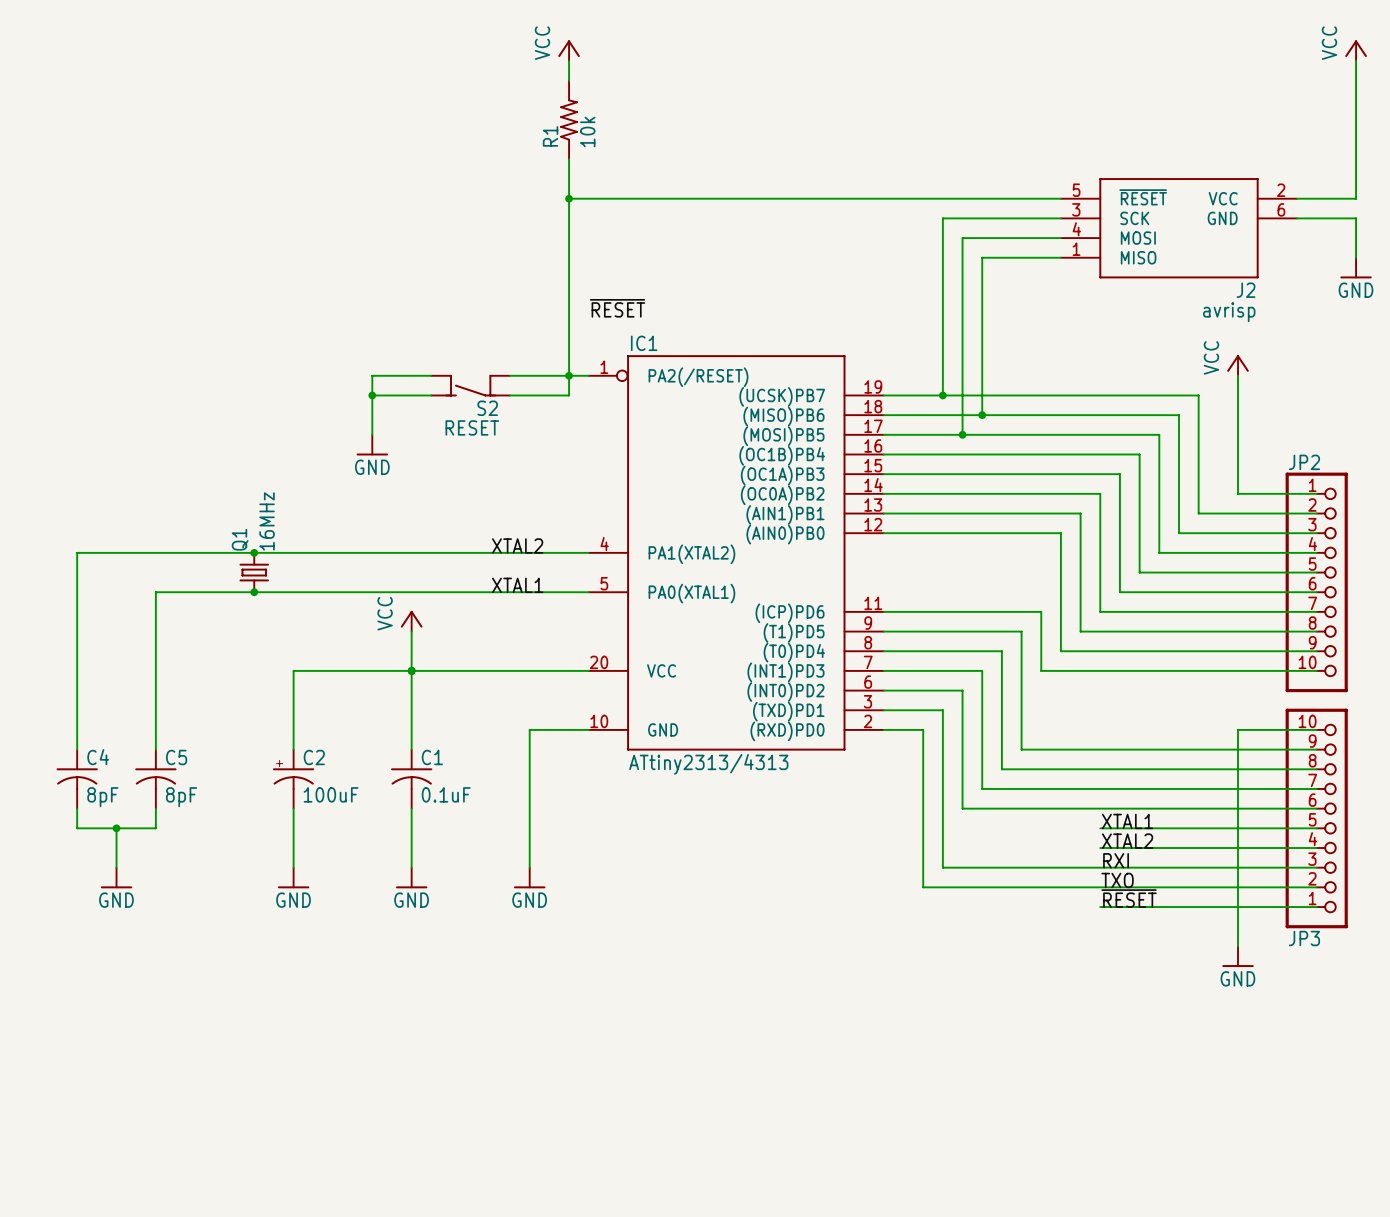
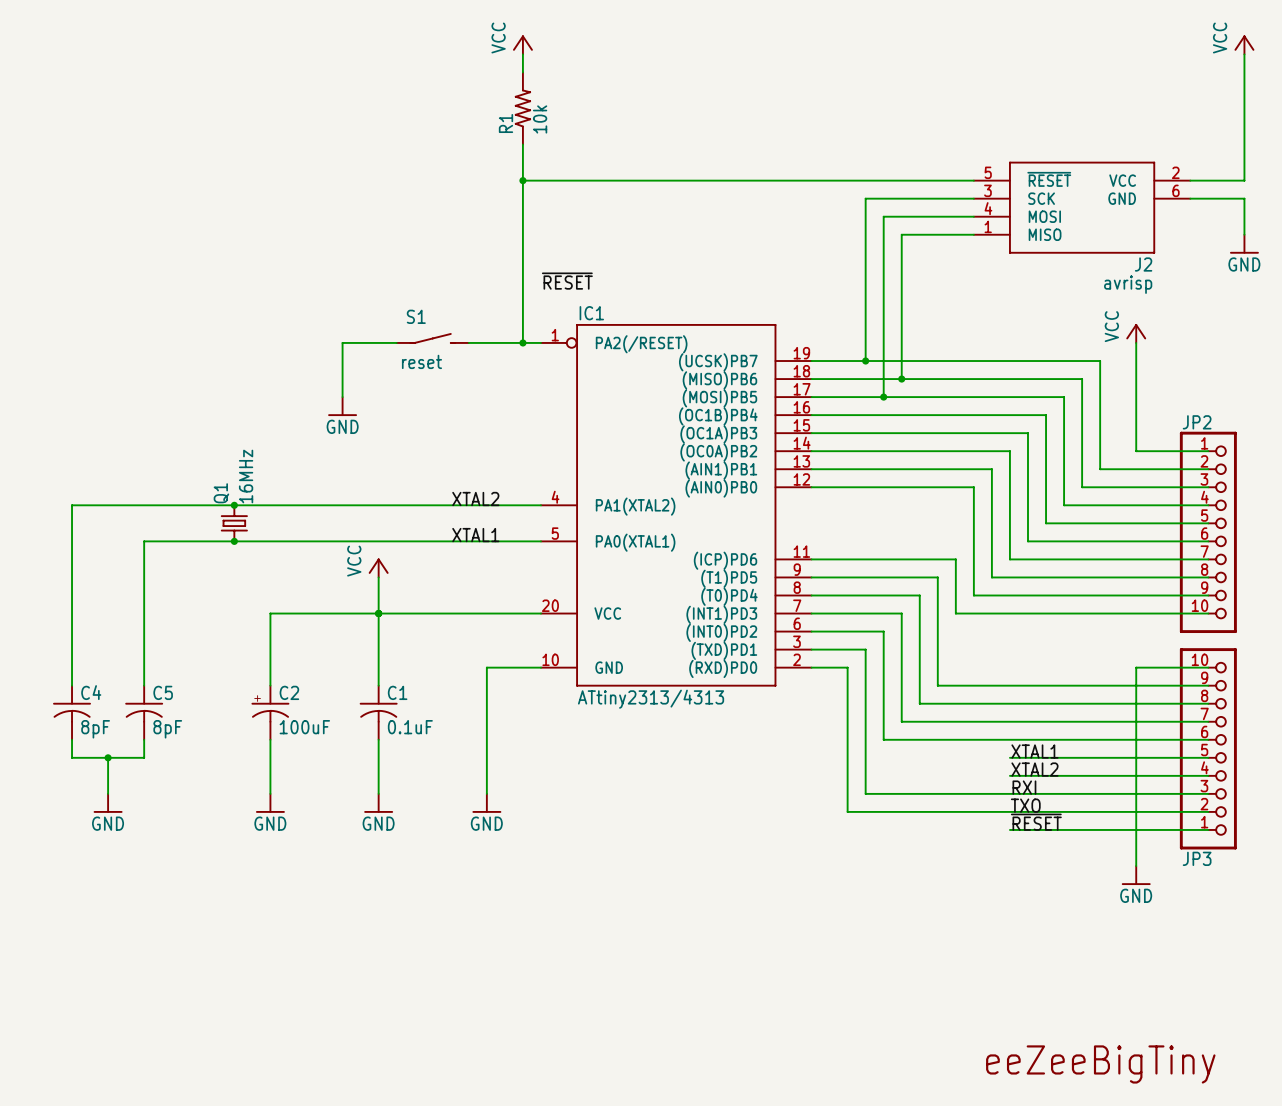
S1: none -> reset (432, 338)
wire: (569, 375) (569, 395) (510, 395) -> none
S2: RESET (470, 385) -> none
wire: (372, 395) (431, 395) -> none
junction: (372, 395) -> none
text: none -> eeZeeBigTiny (1100, 1064)

